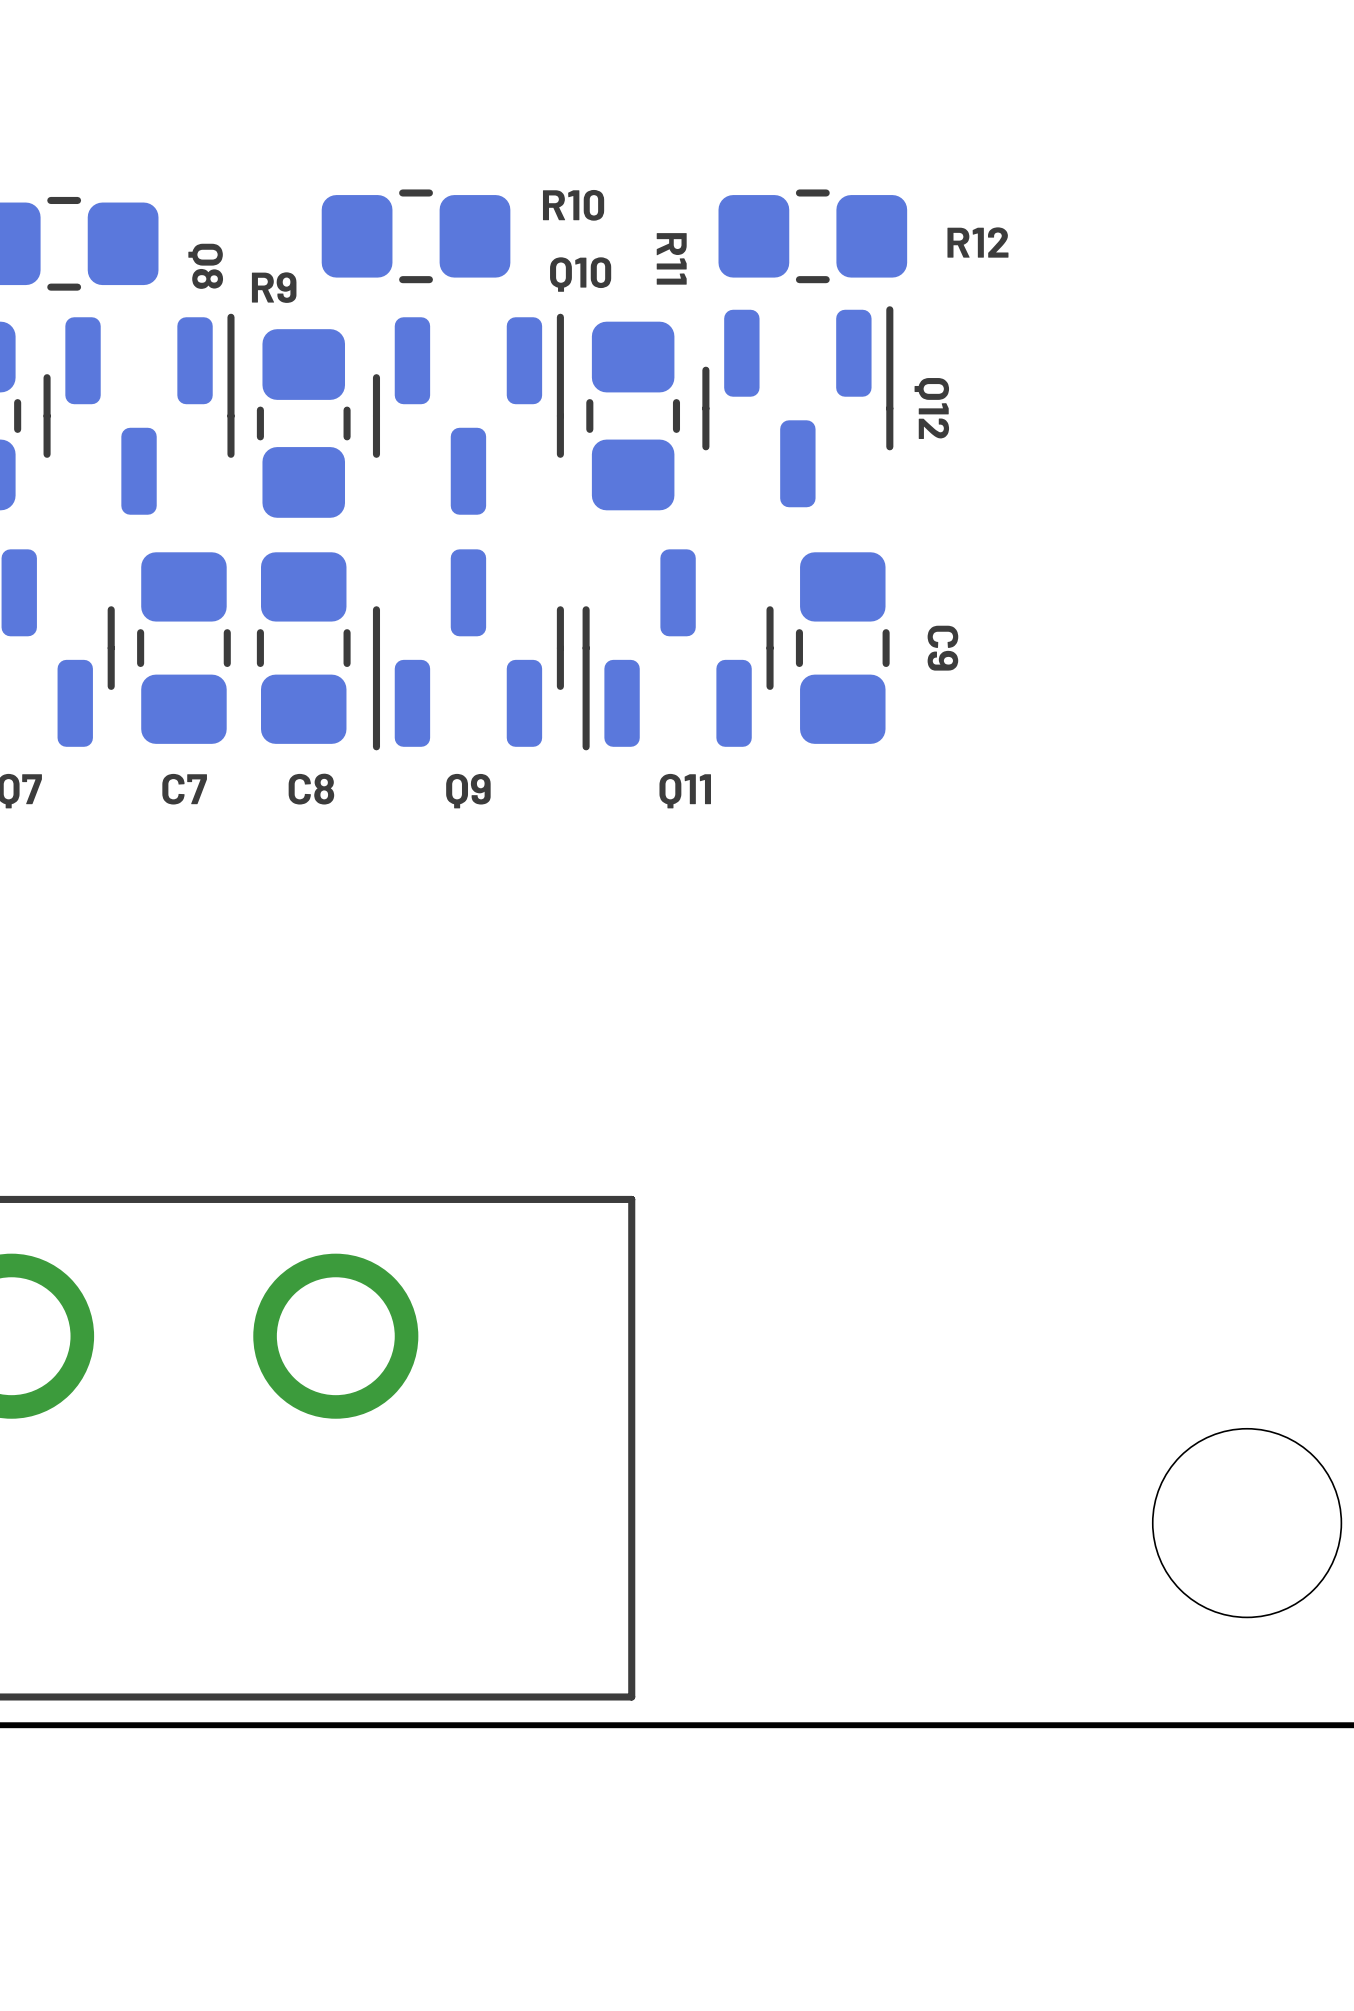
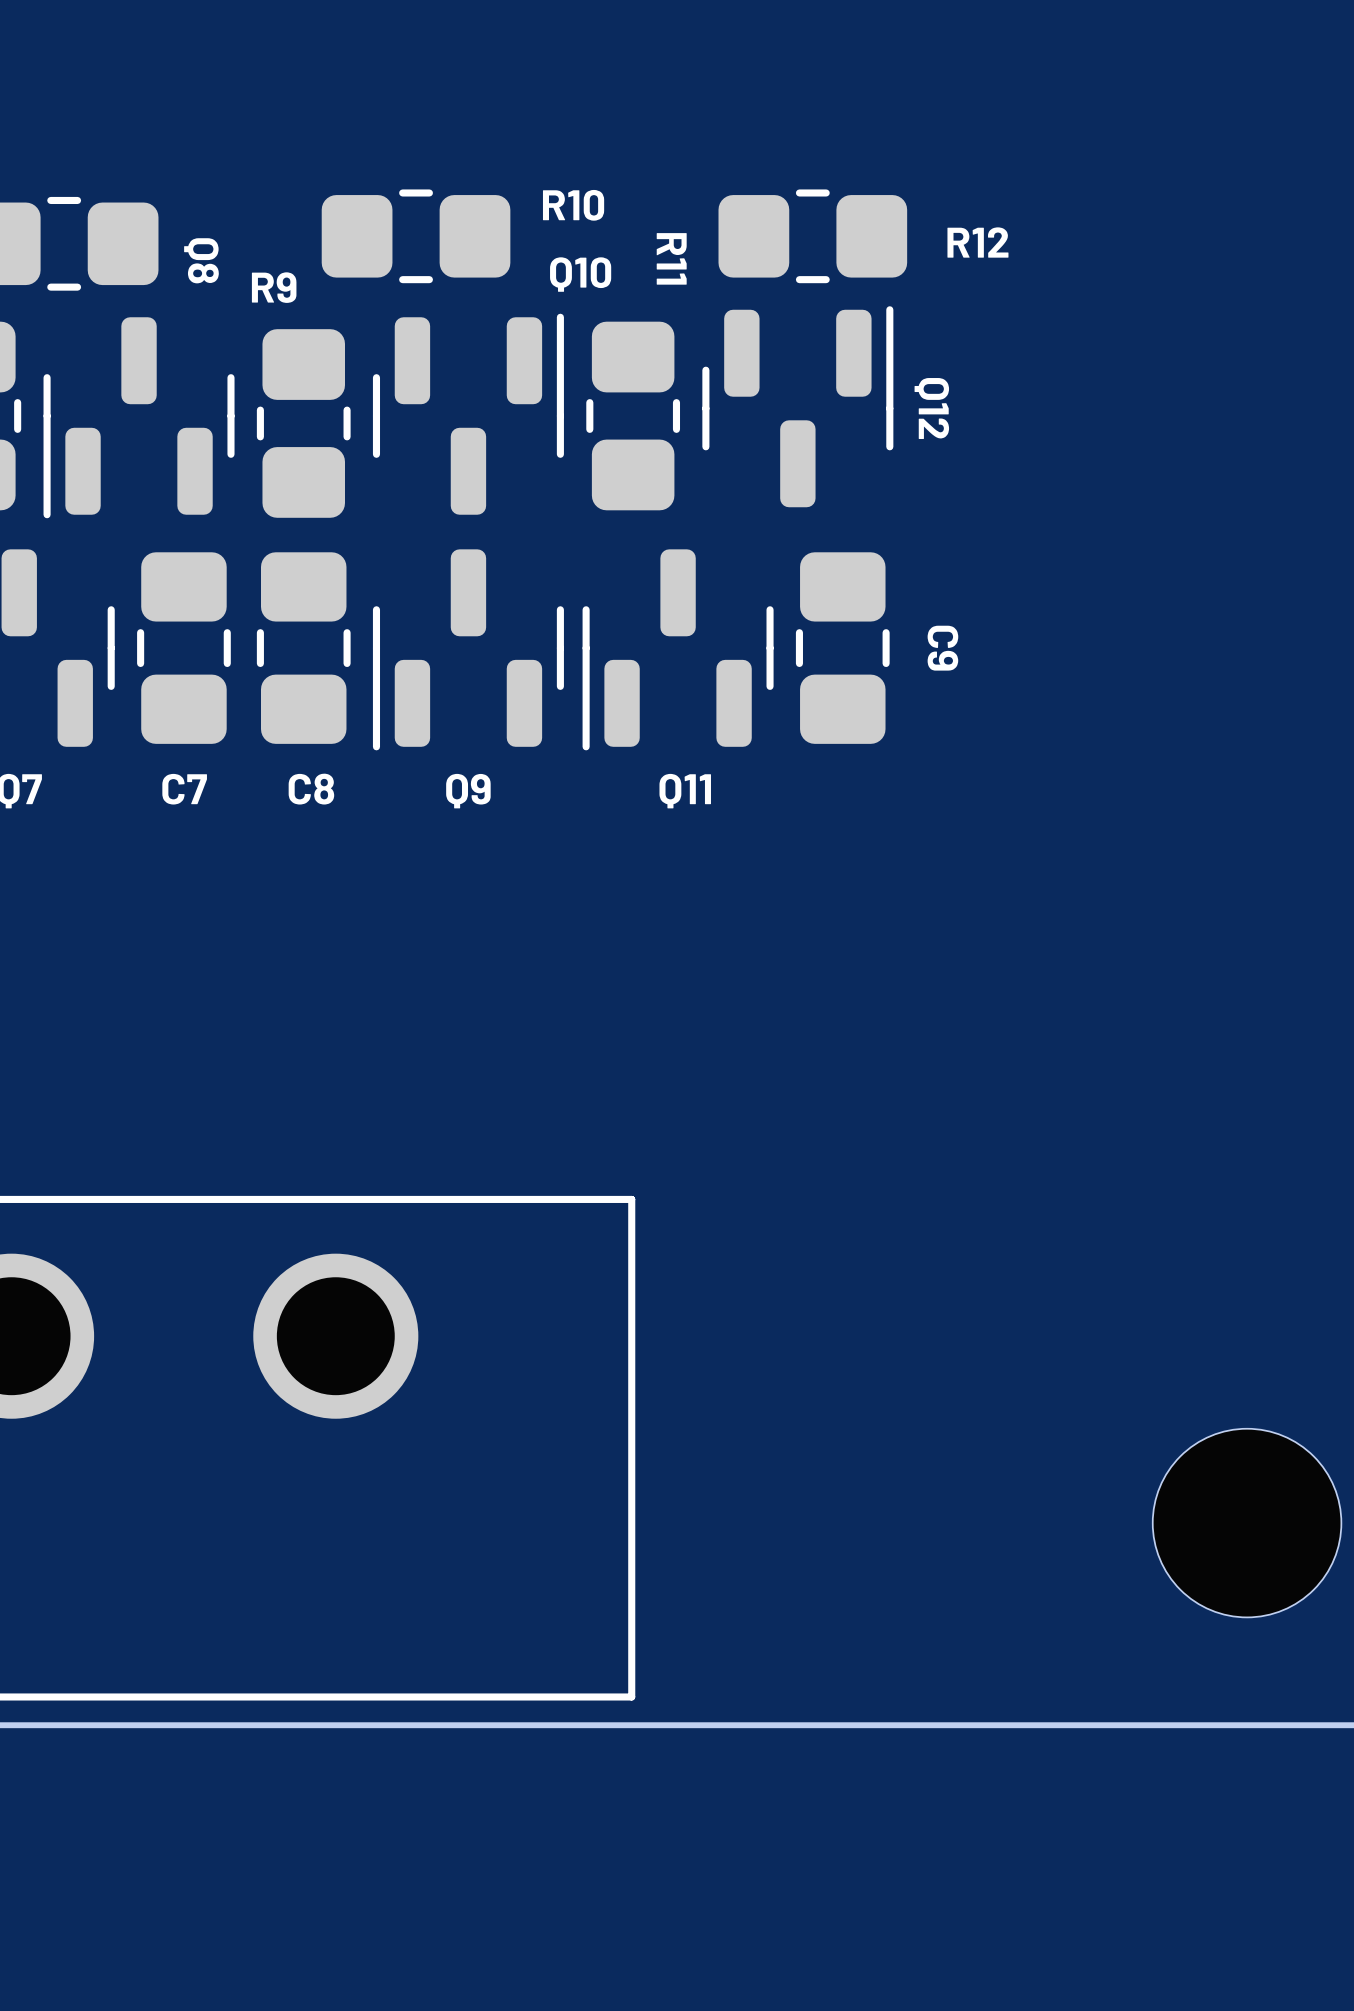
Q8 rotation: 0° (139, 414) -> 180° (139, 417)

